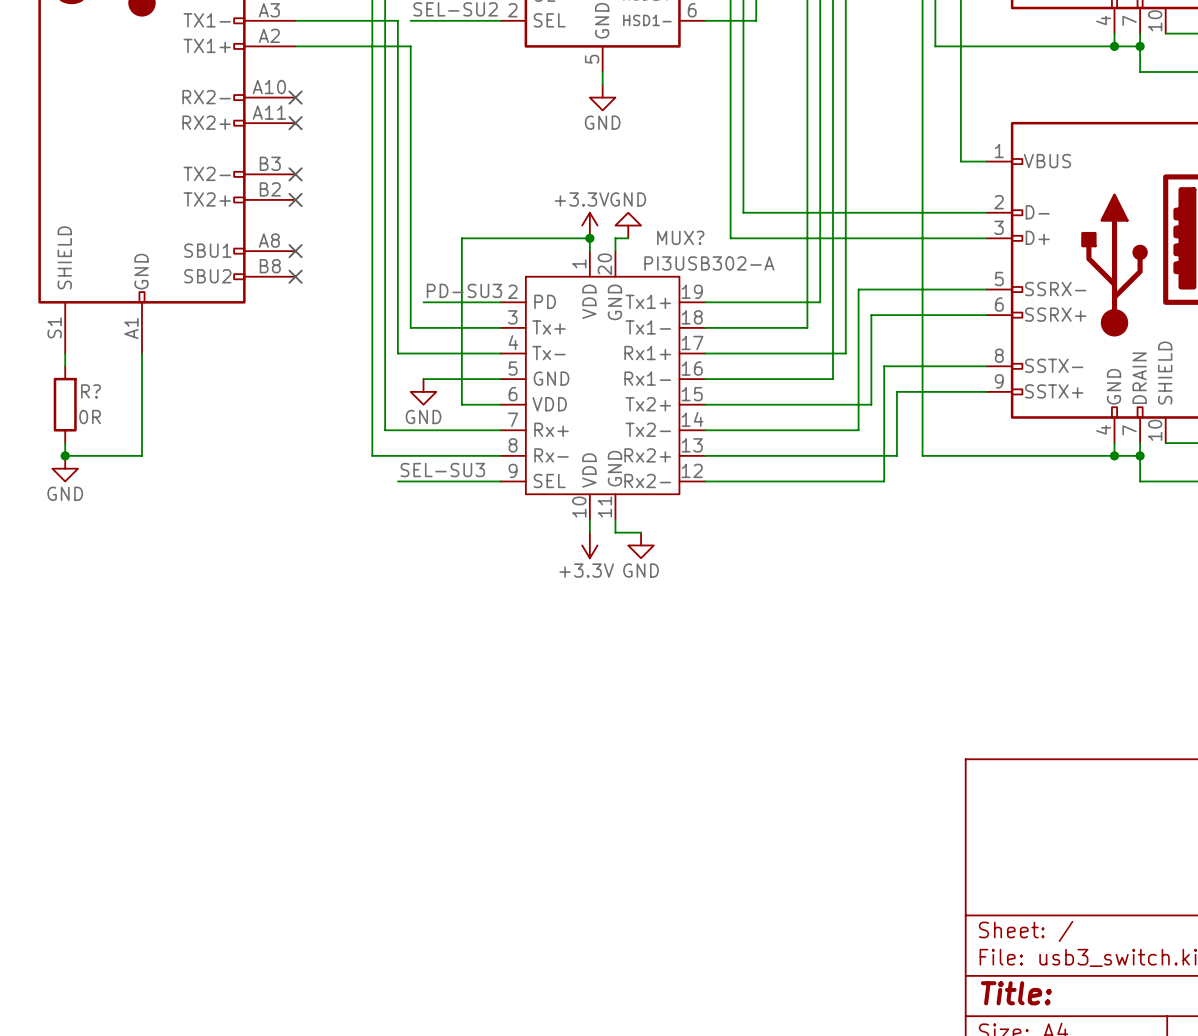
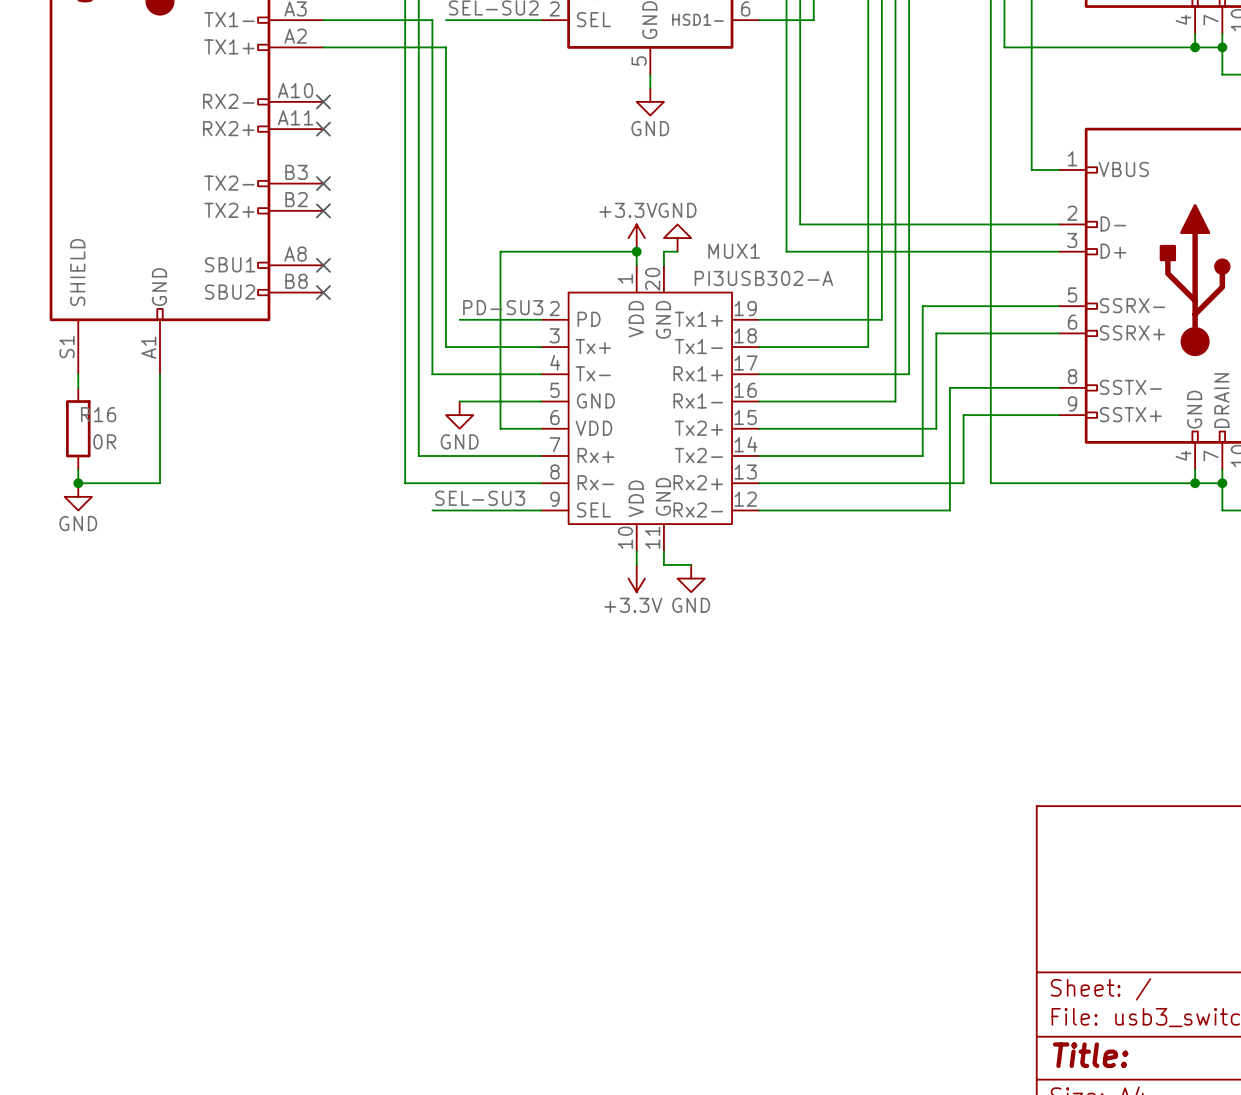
MUX? name: MUX? (680, 237) -> MUX1 (734, 251)
R? name: R? (91, 391) -> R16 (98, 414)

